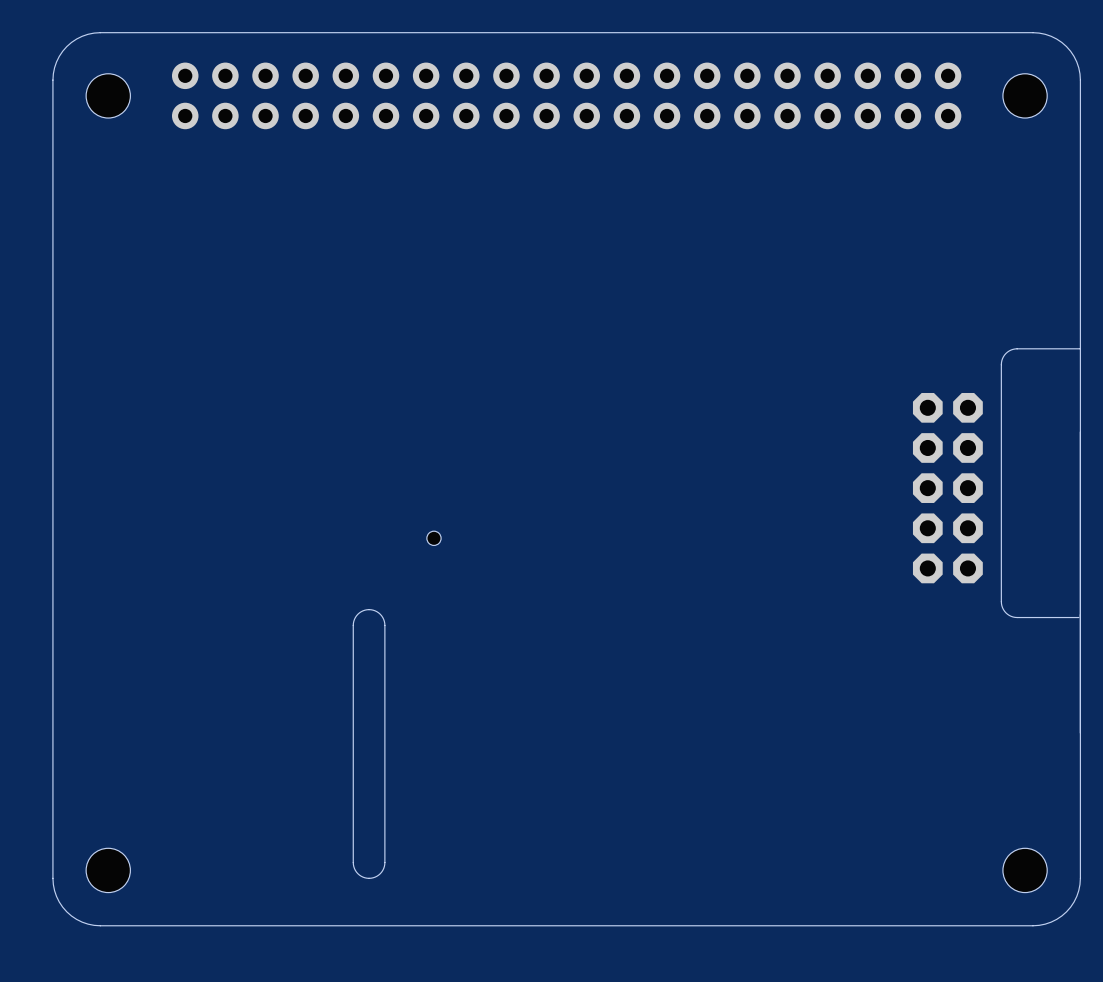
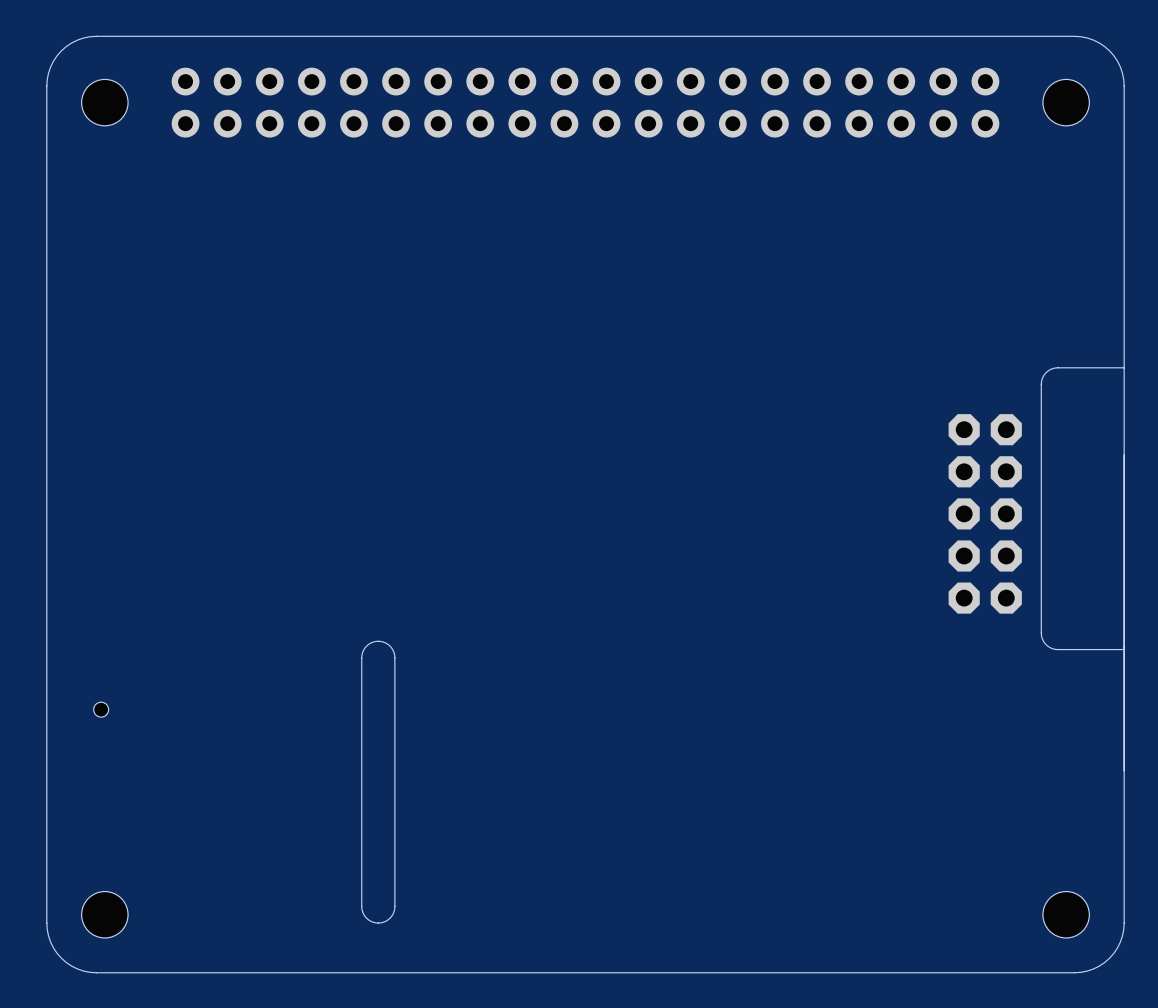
part position: (433, 538) -> (101, 709)

